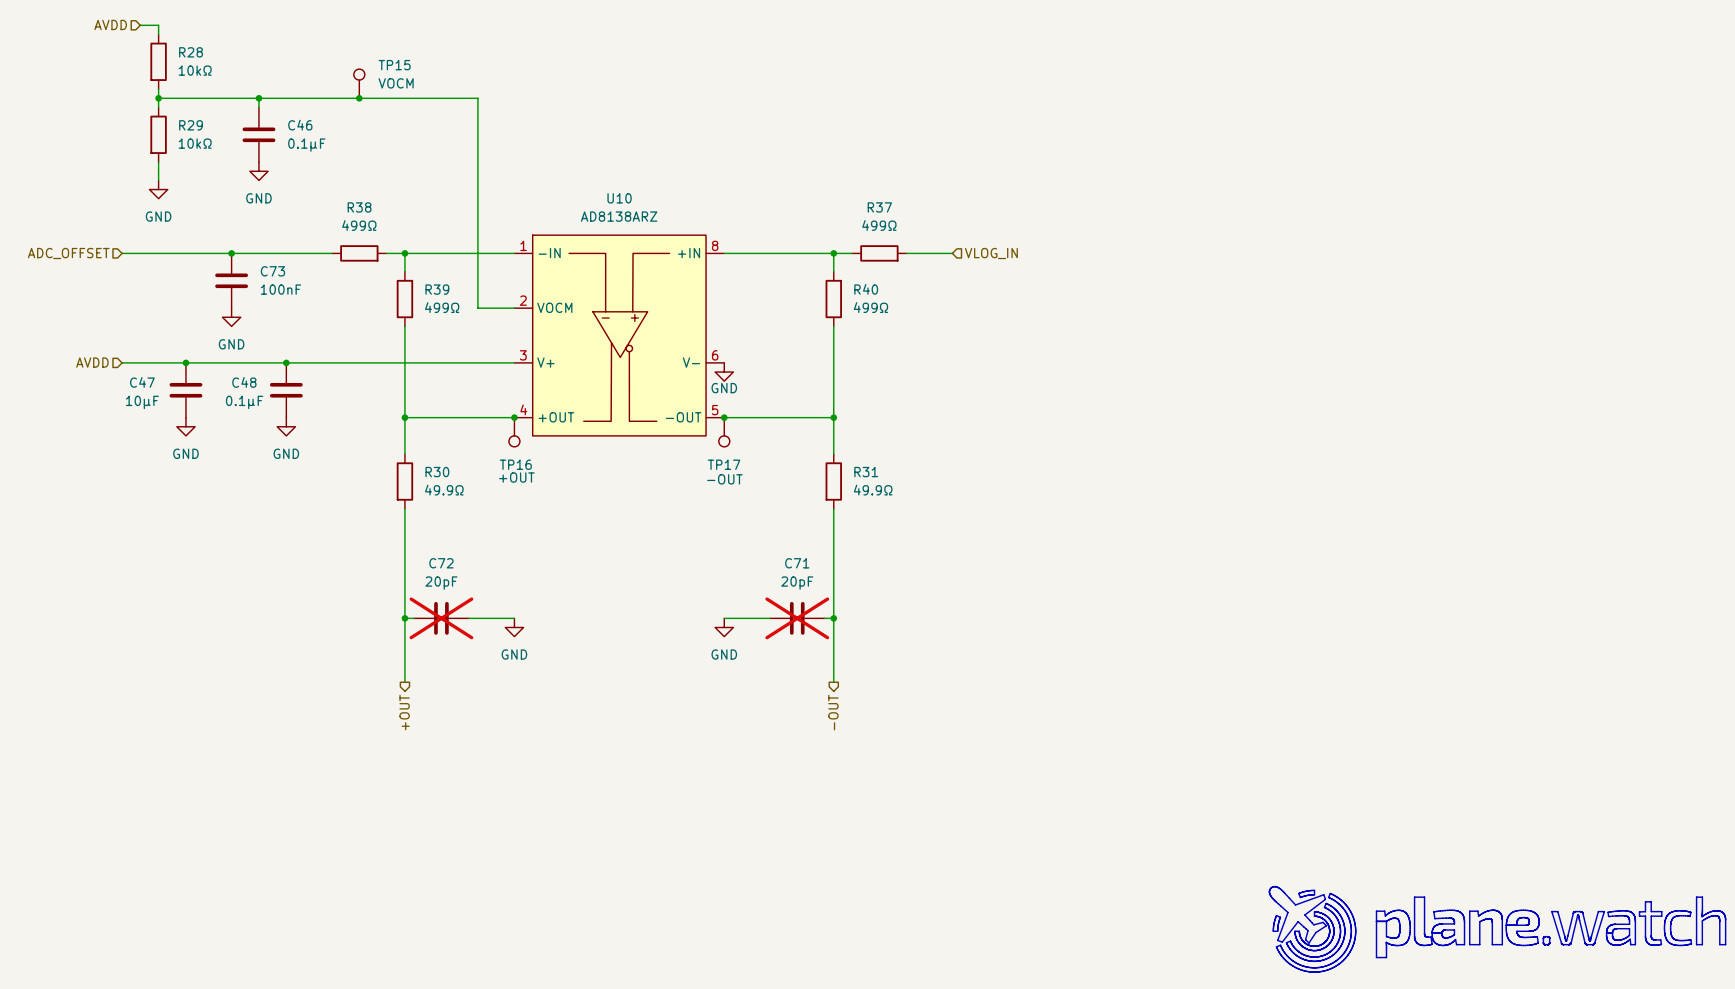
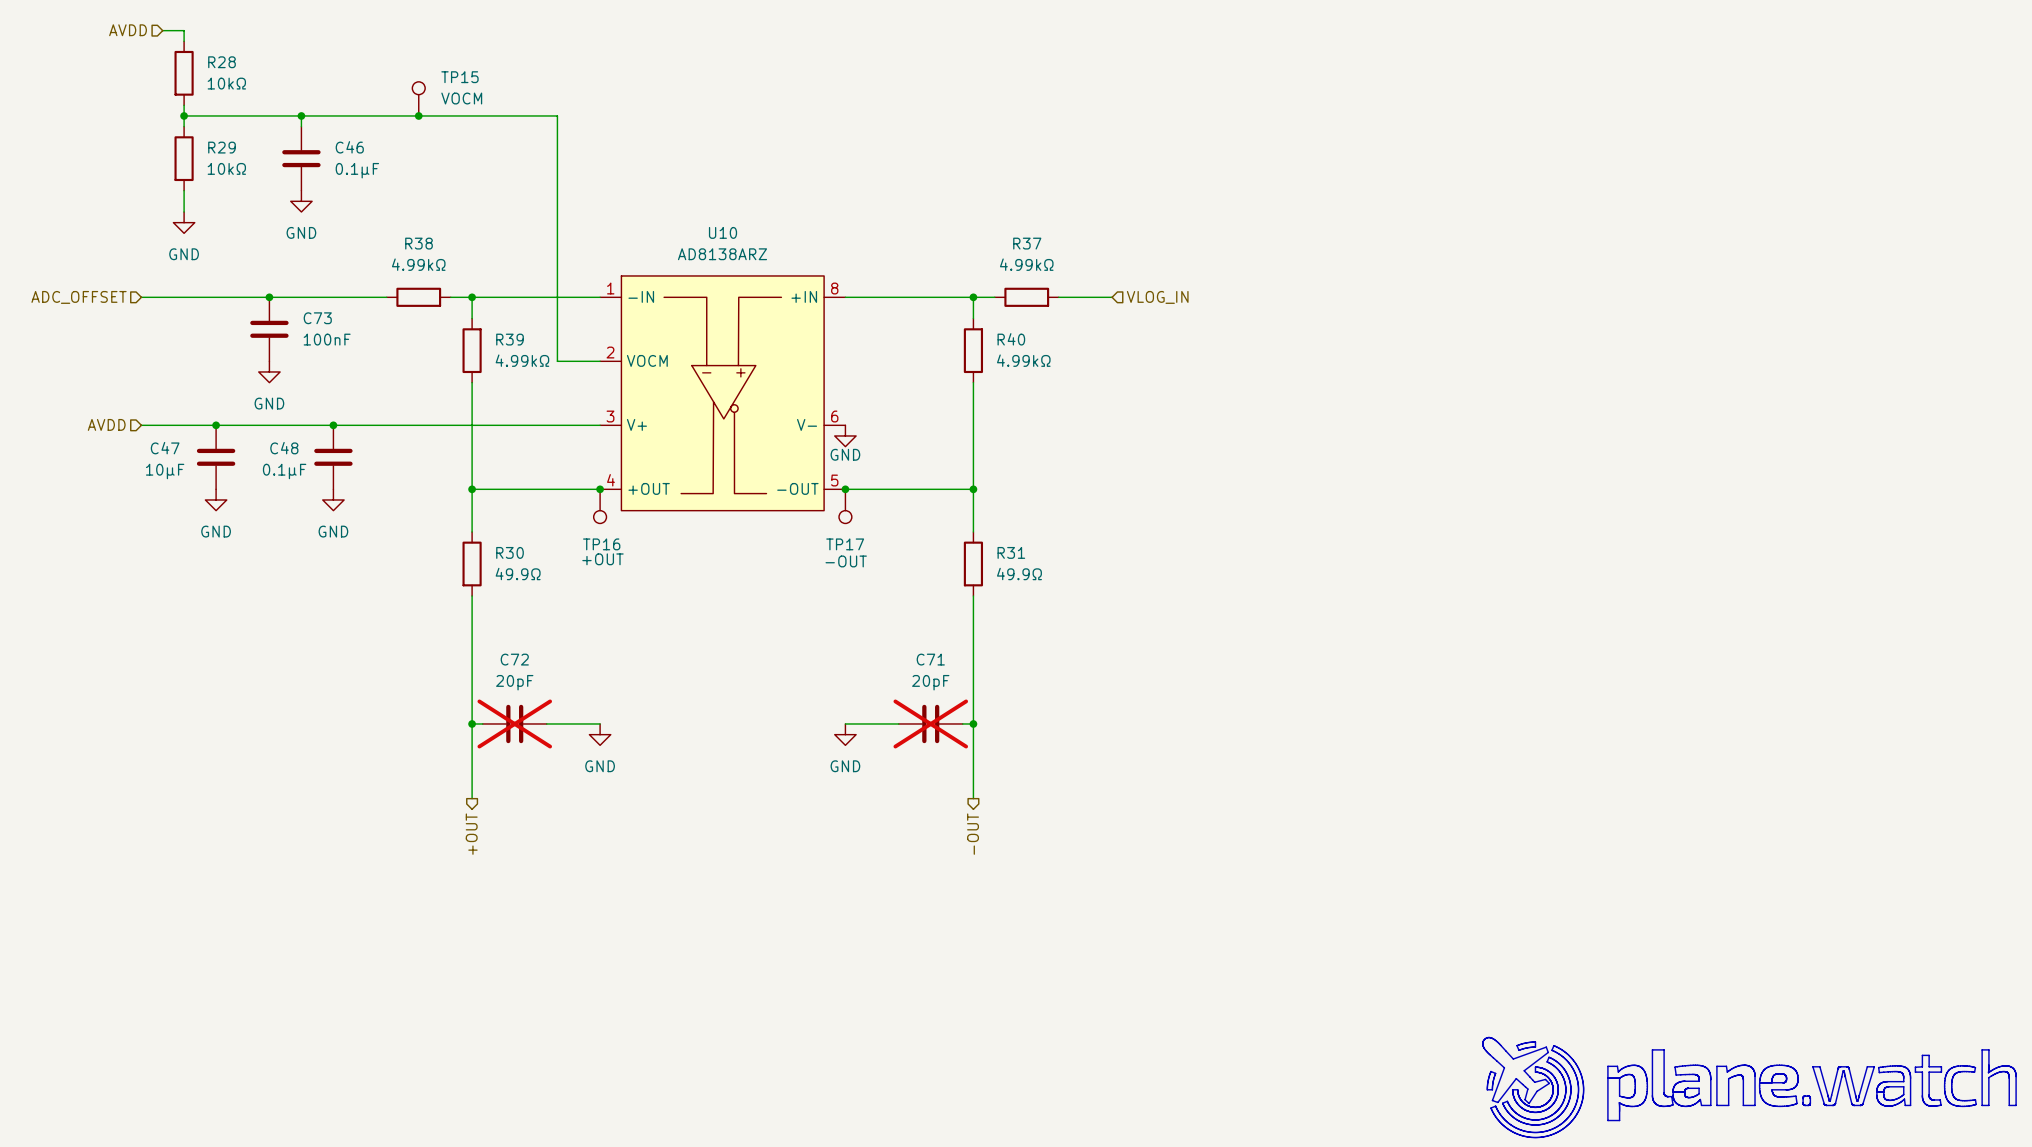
R38 value: 499Ω (359, 225) -> 4.99kΩ (418, 264)
R37 value: 499Ω (879, 225) -> 4.99kΩ (1026, 264)
R39 value: 499Ω (442, 307) -> 4.99kΩ (522, 360)
R40 value: 499Ω (870, 307) -> 4.99kΩ (1023, 360)

